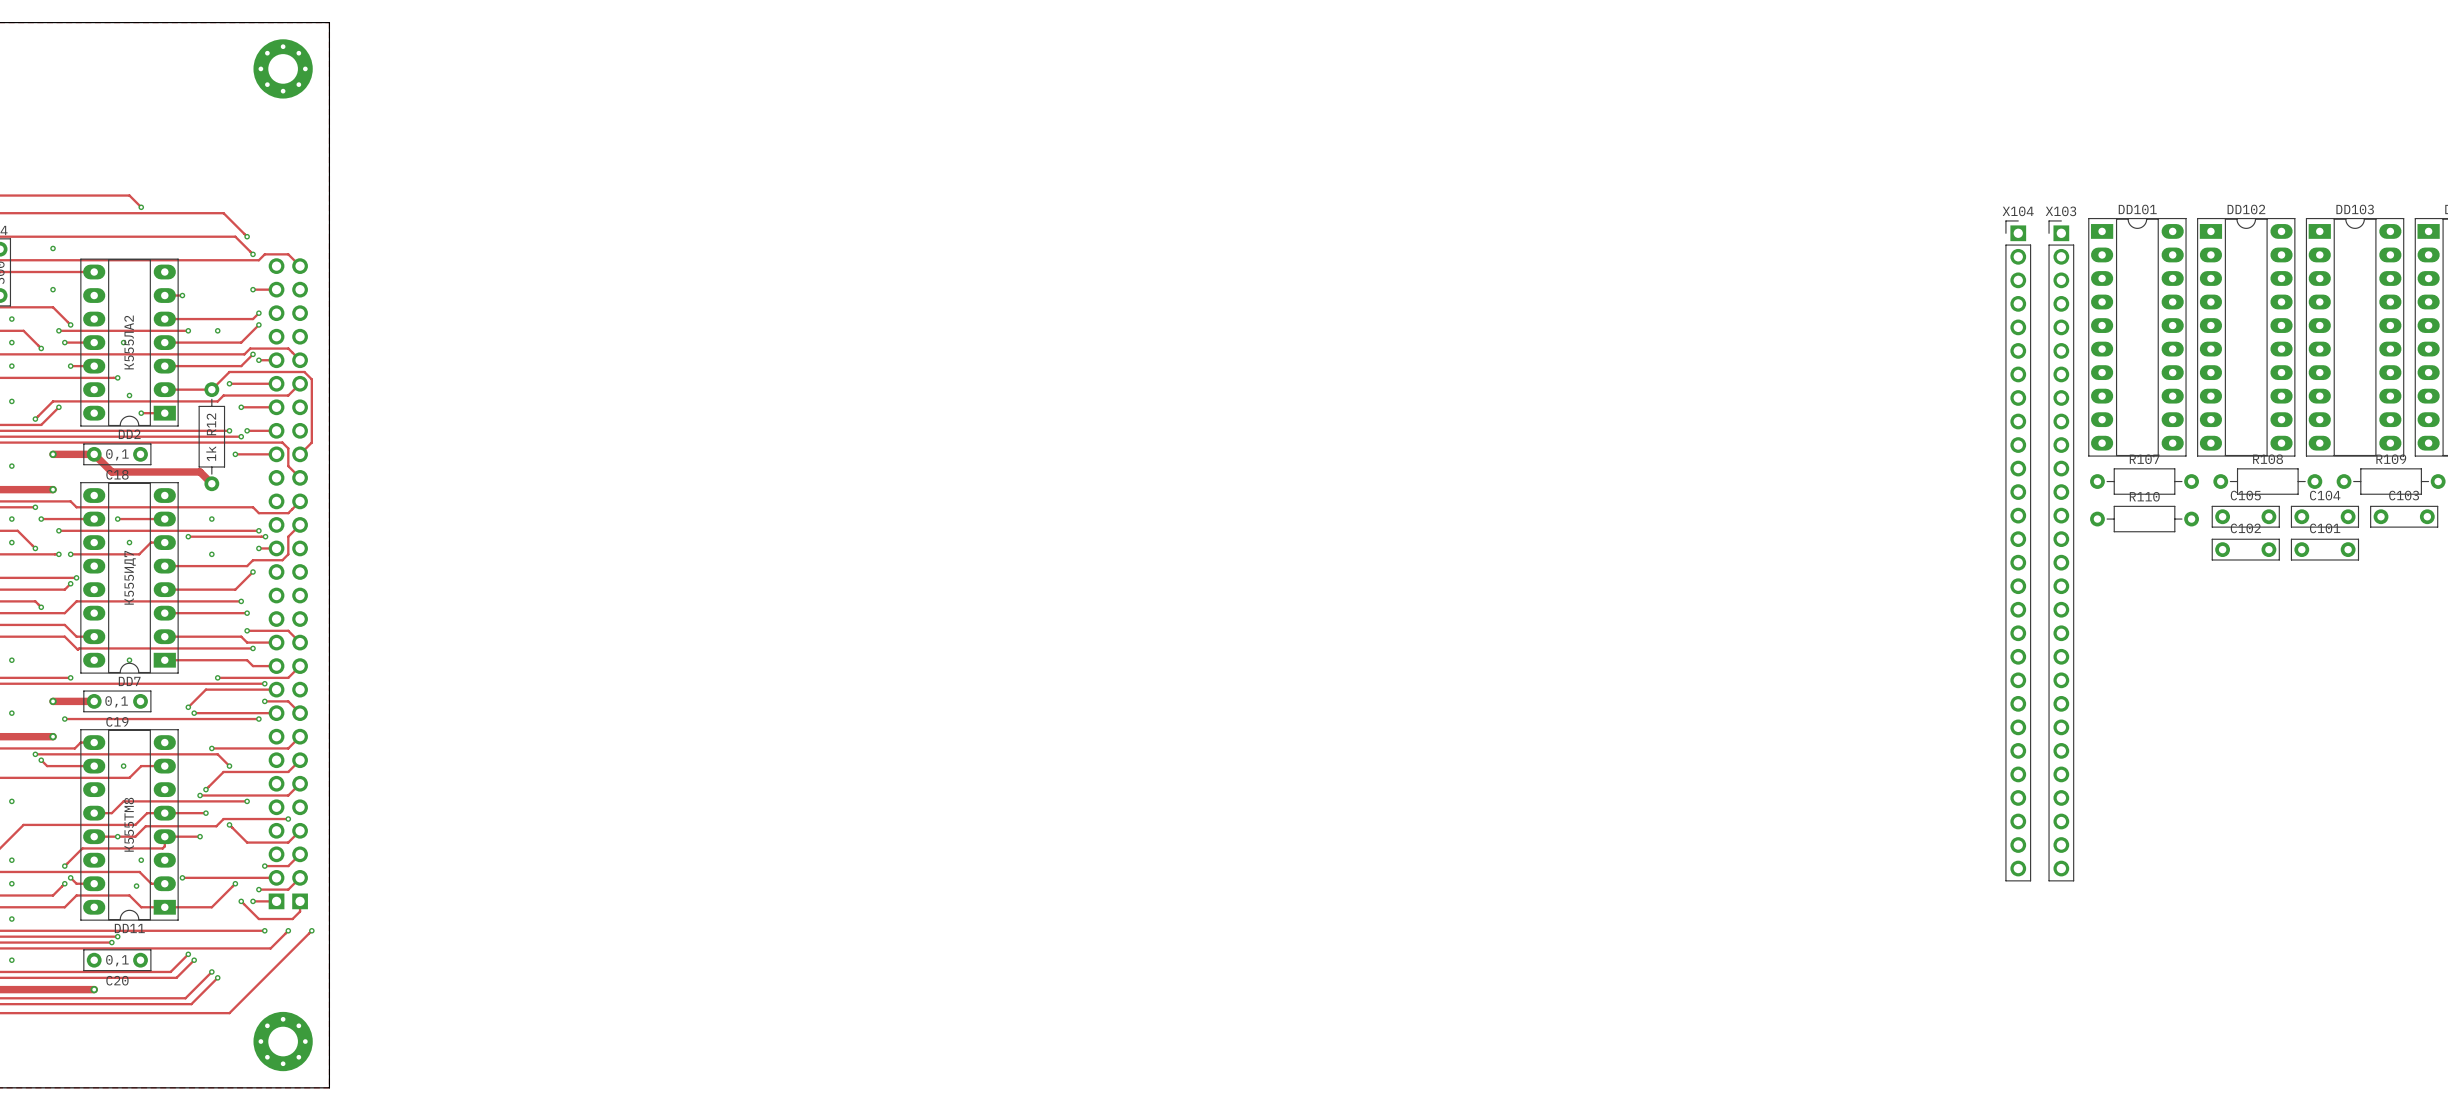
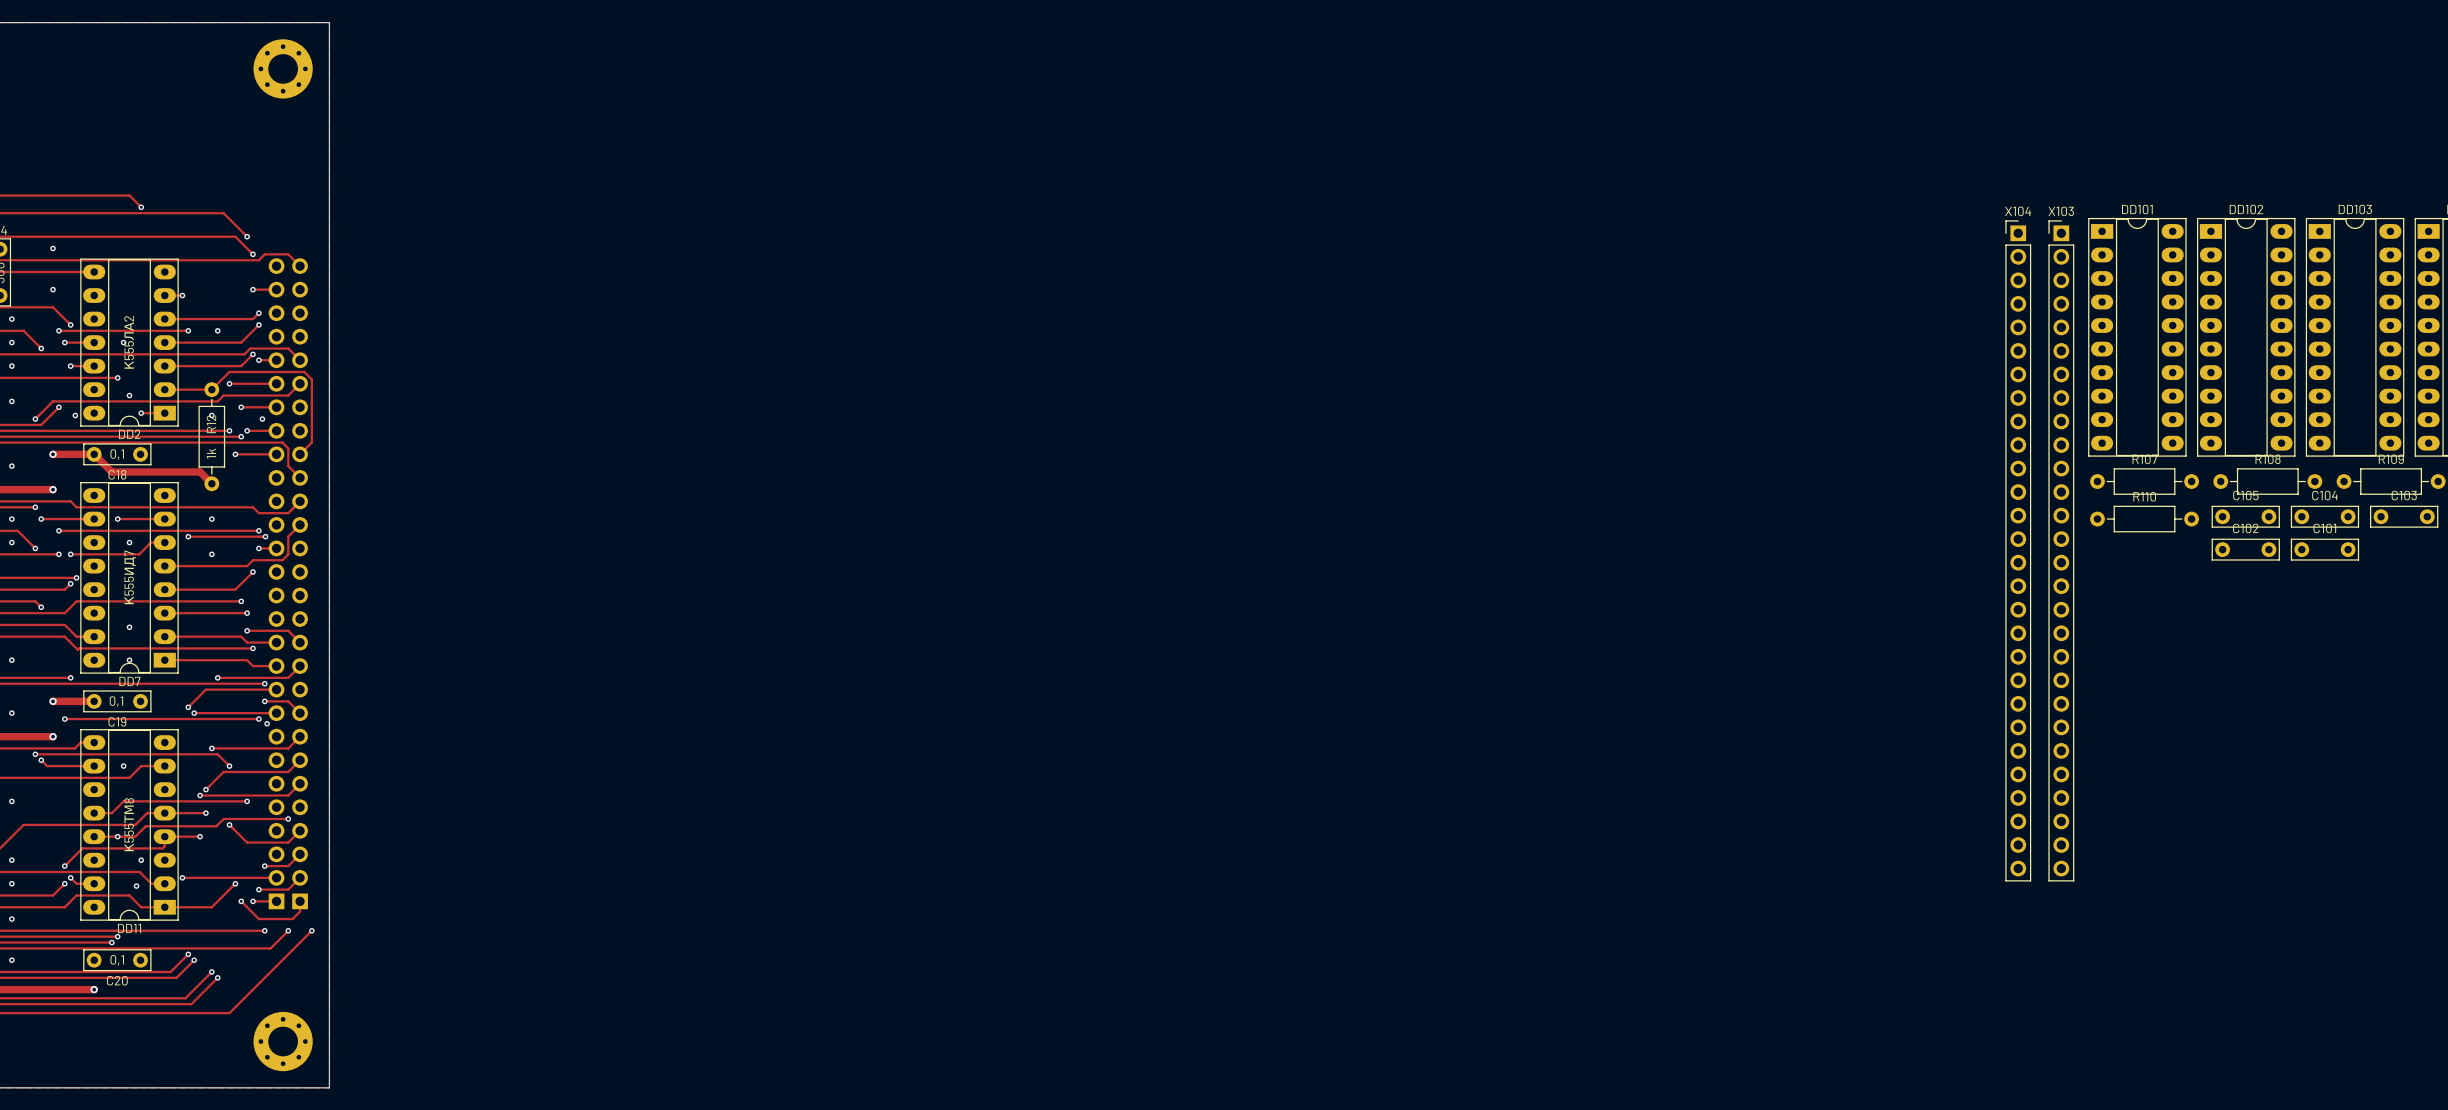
via: none -> (75, 415)
via: none -> (211, 415)
via: none -> (262, 419)
via: none -> (129, 627)
via: none -> (267, 723)

